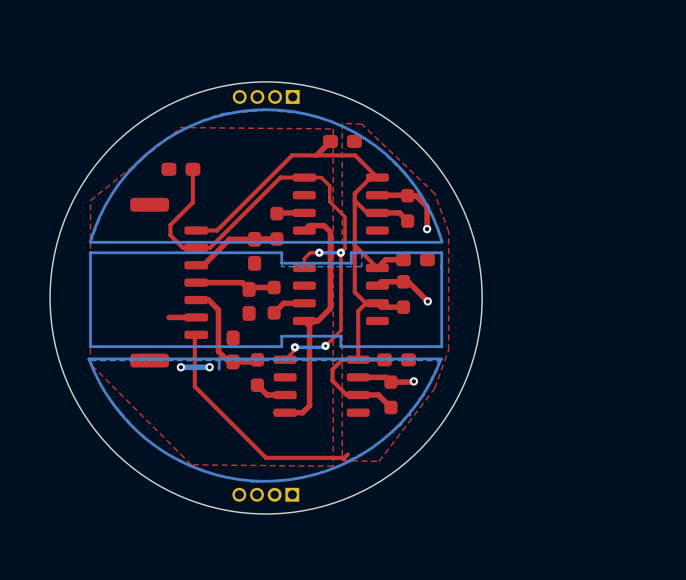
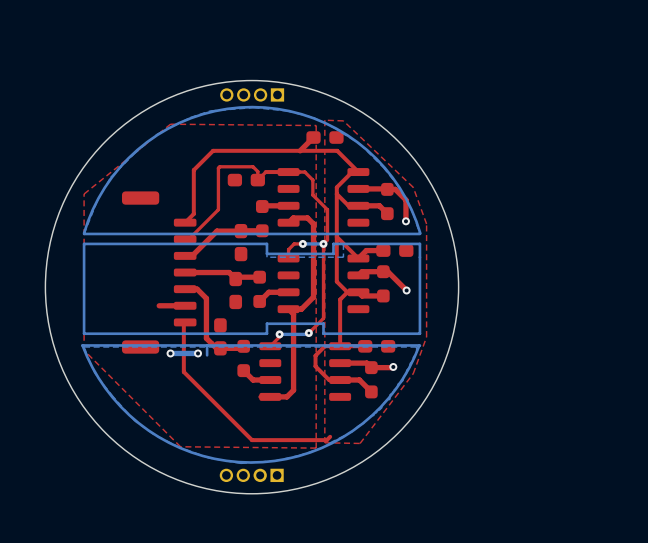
top track: (292, 155) (217, 230) (196, 230) -> (276, 150) (213, 150) (193, 170) (193, 214) (185, 222)
part position: (180, 169) -> (246, 180)
top track: (192, 169) (192, 202) (170, 224) (170, 235) (182, 247) (196, 247) -> none
top track: (280, 177) (210, 247) (200, 247) -> (265, 172) (257, 180) (257, 171) (253, 166) (219, 166) (218, 209) (188, 239)

